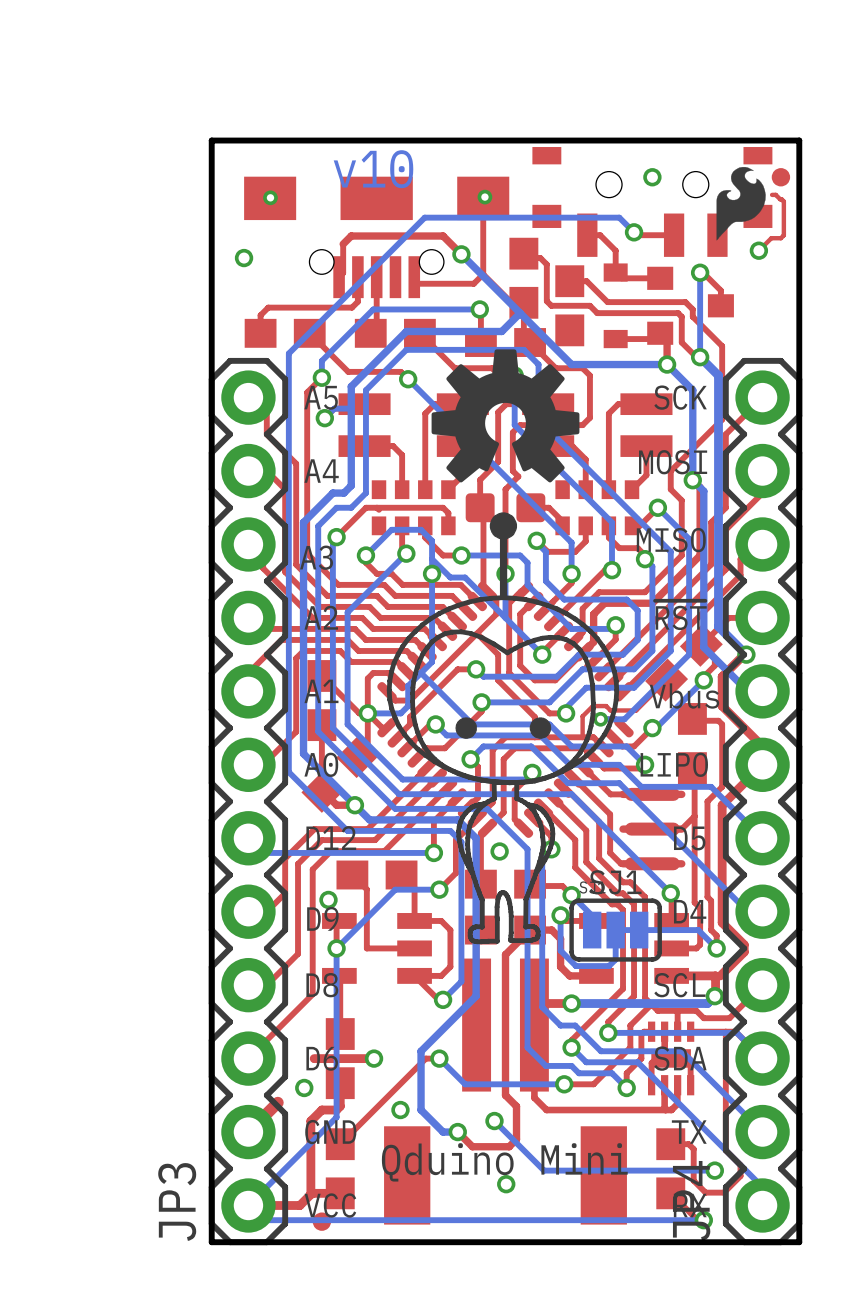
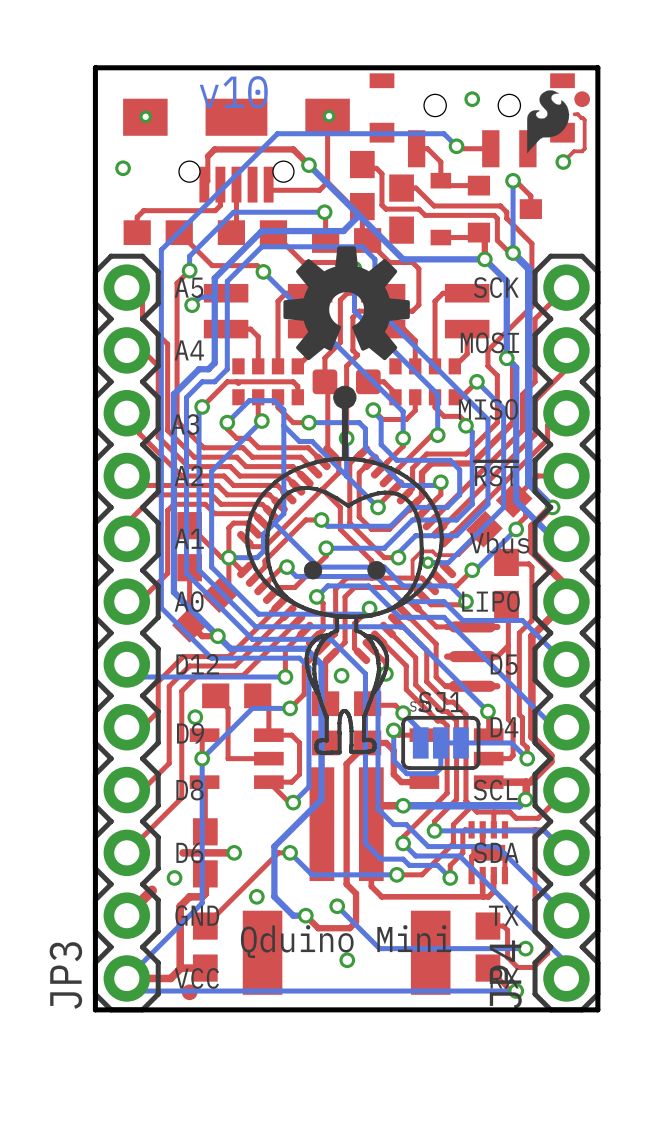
via: (432, 573) -> none

